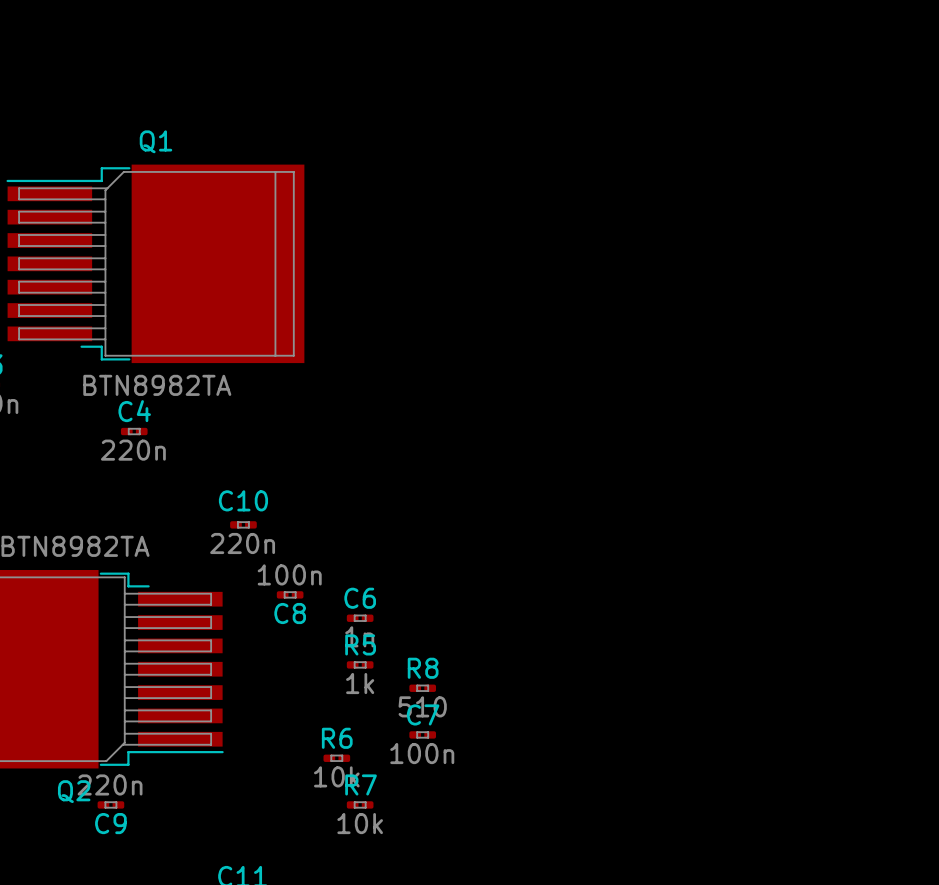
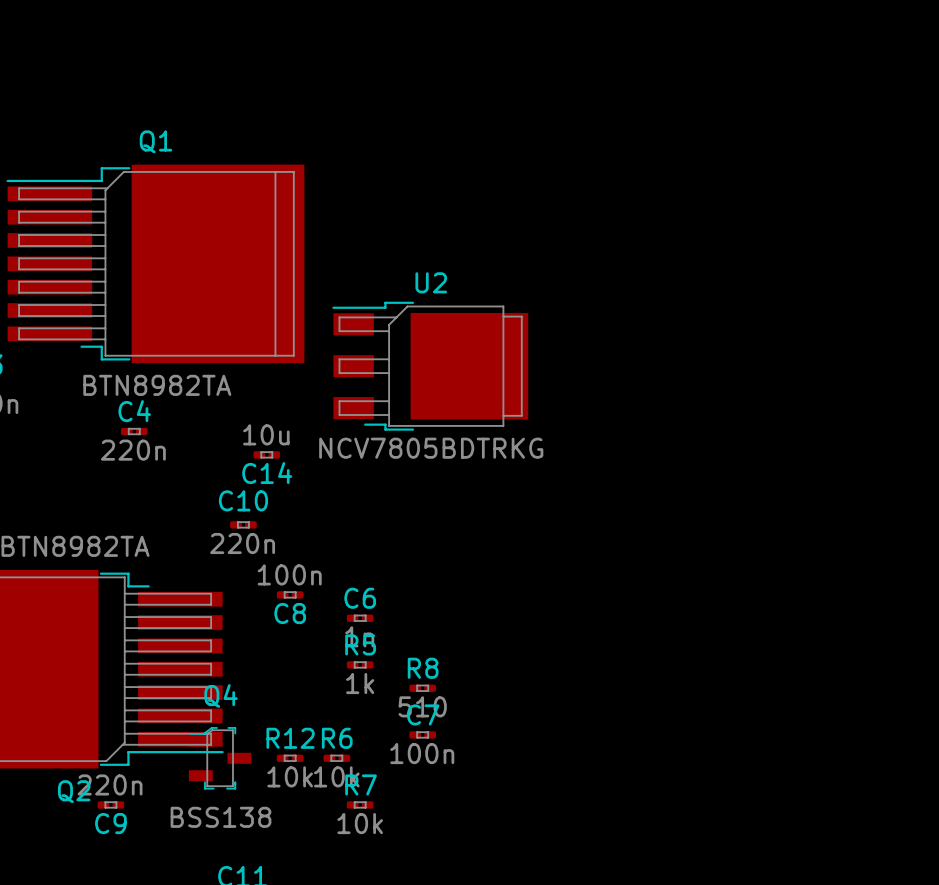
U2: none -> NCV7805BDTRKG (430, 366)
C14: none -> 10u (266, 454)
Q4: none -> BSS138 (220, 758)
R12: none -> 10k (290, 758)

